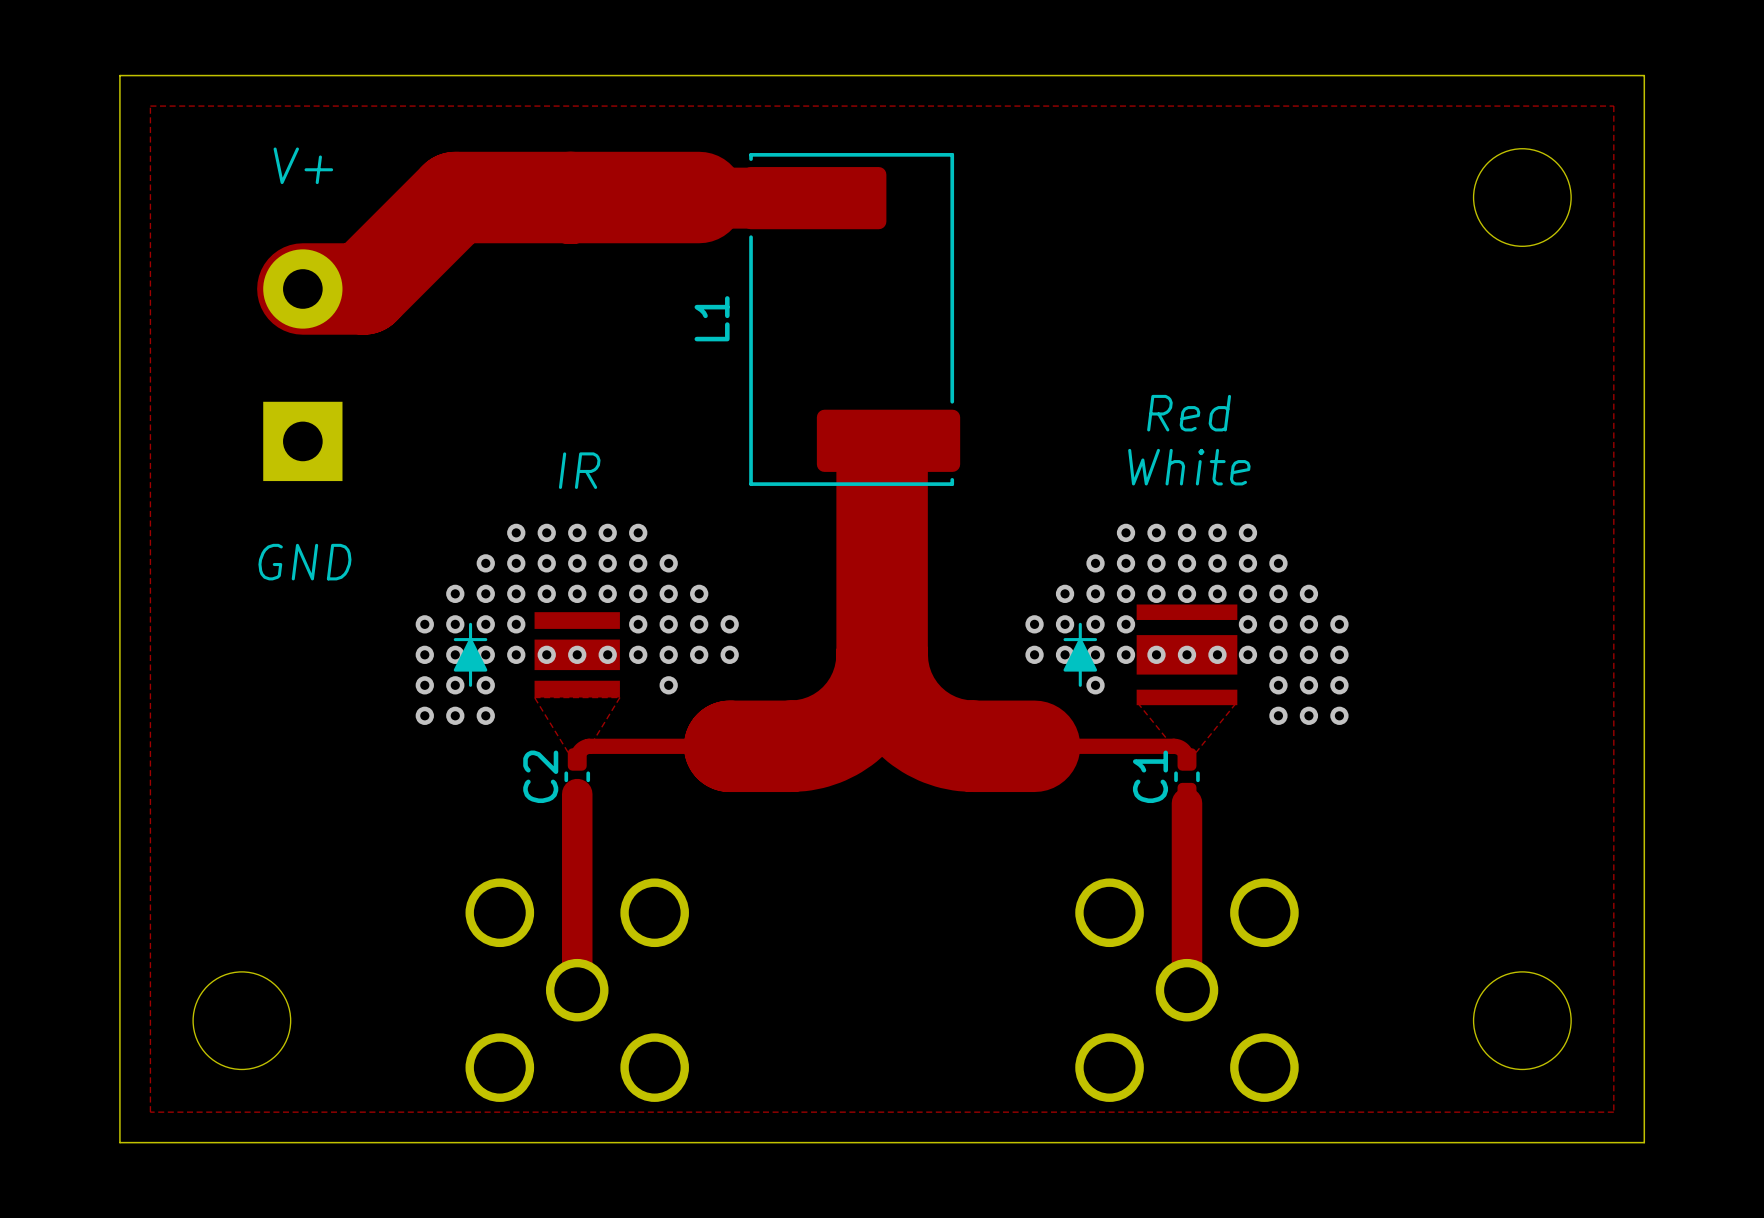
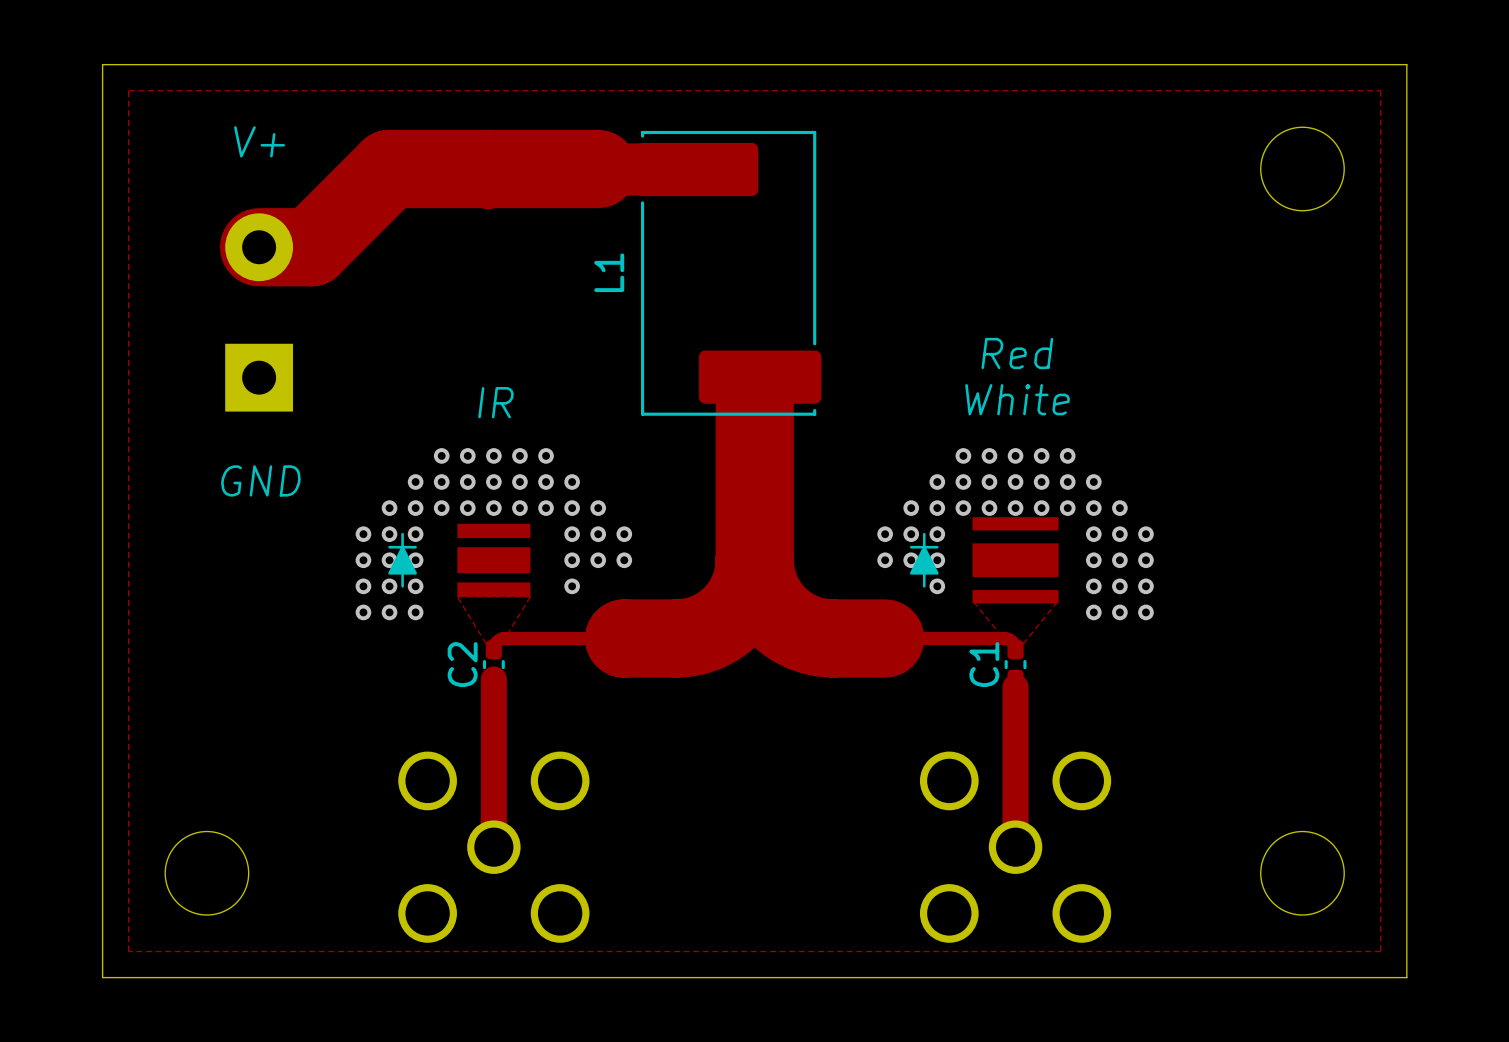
via: (516, 624) -> none
via: (638, 624) -> none
via: (1126, 624) -> none
via: (1247, 624) -> none
via: (516, 654) -> none
via: (546, 654) -> none
via: (577, 654) -> none
via: (607, 654) -> none
via: (638, 654) -> none
via: (1126, 654) -> none
via: (1156, 654) -> none
via: (1186, 654) -> none
via: (1217, 654) -> none
via: (1247, 654) -> none

